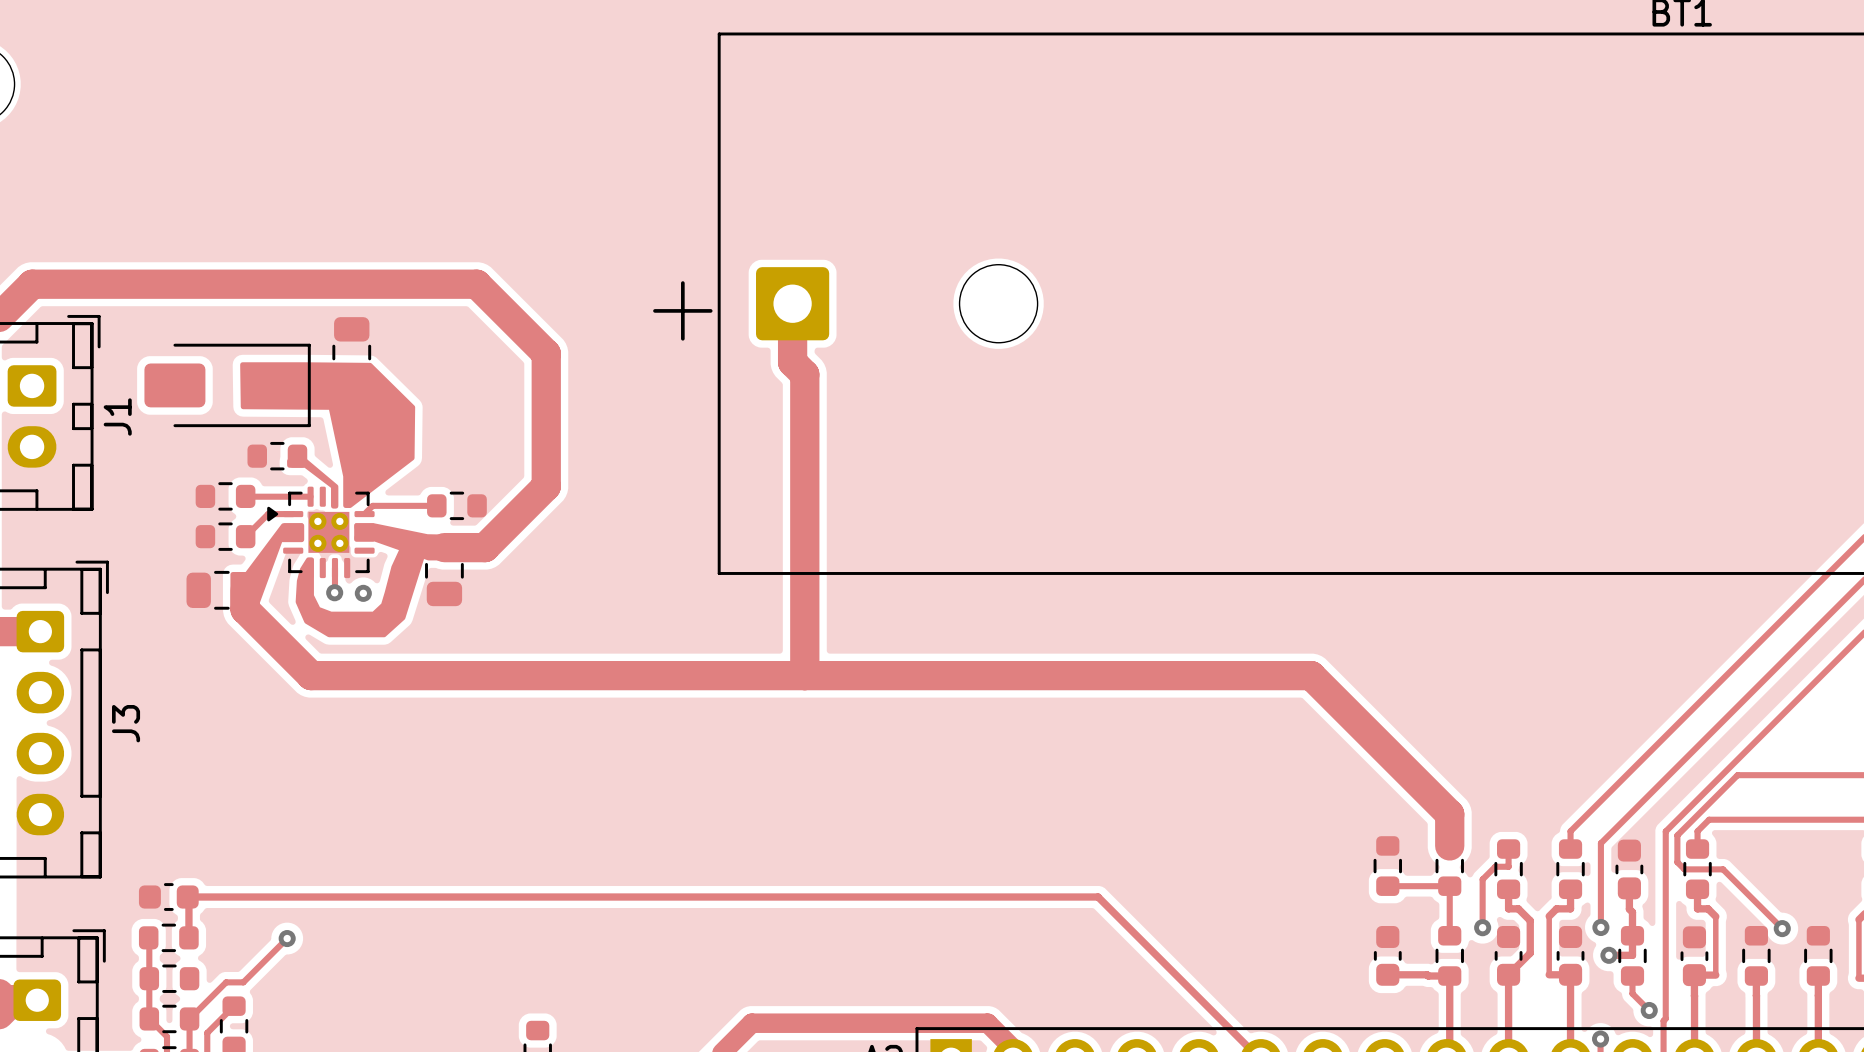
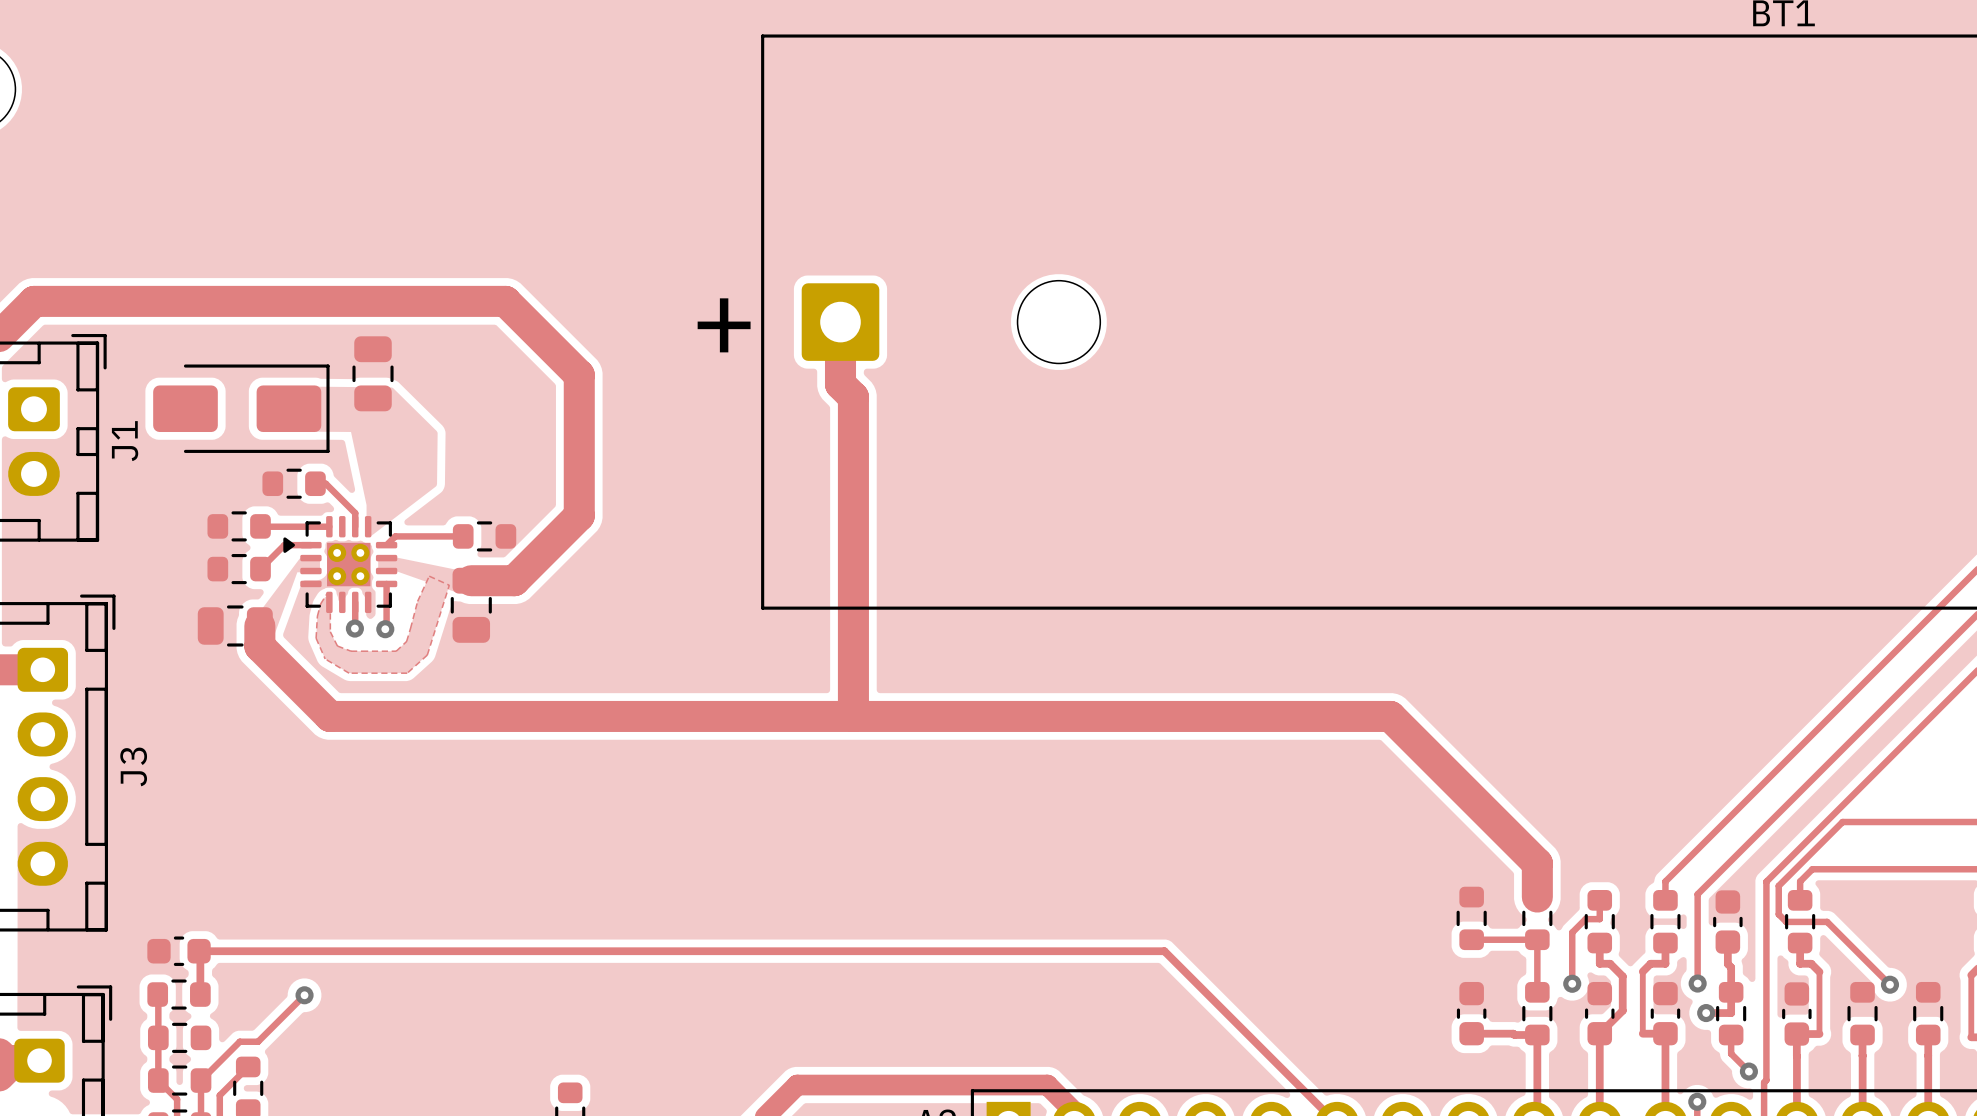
drawing: [230, 362, 463, 638] -> none
track: none -> (315, 483) (325, 483) (355, 513) (355, 526)
zone outline: none -> (429, 576) (417, 601) (406, 641) (396, 651) (351, 651) (337, 646) (330, 631) (330, 593) (327, 593) (320, 603) (317, 616) (316, 638) (325, 658) (349, 673) (407, 673) (427, 655) (449, 585) (429, 576)
track: none -> (386, 583) (385, 629)

